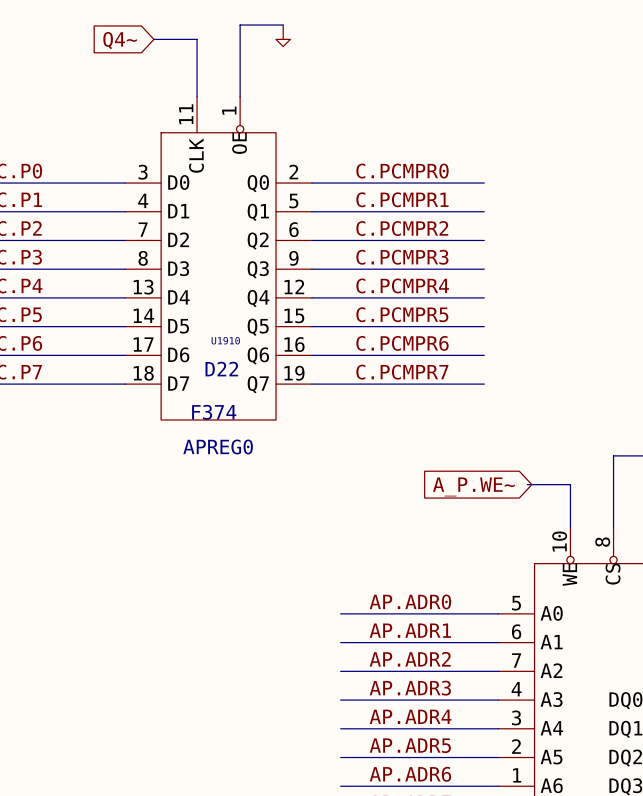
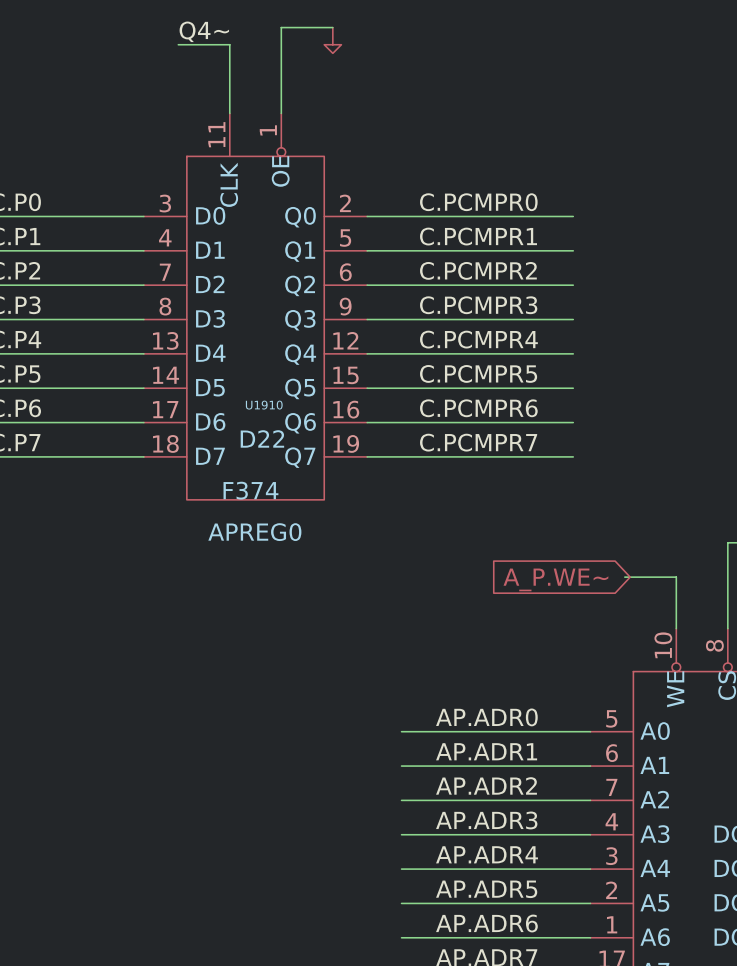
label: none -> Q4~ (204, 31)
global label: Q4~ (120, 40) -> none

